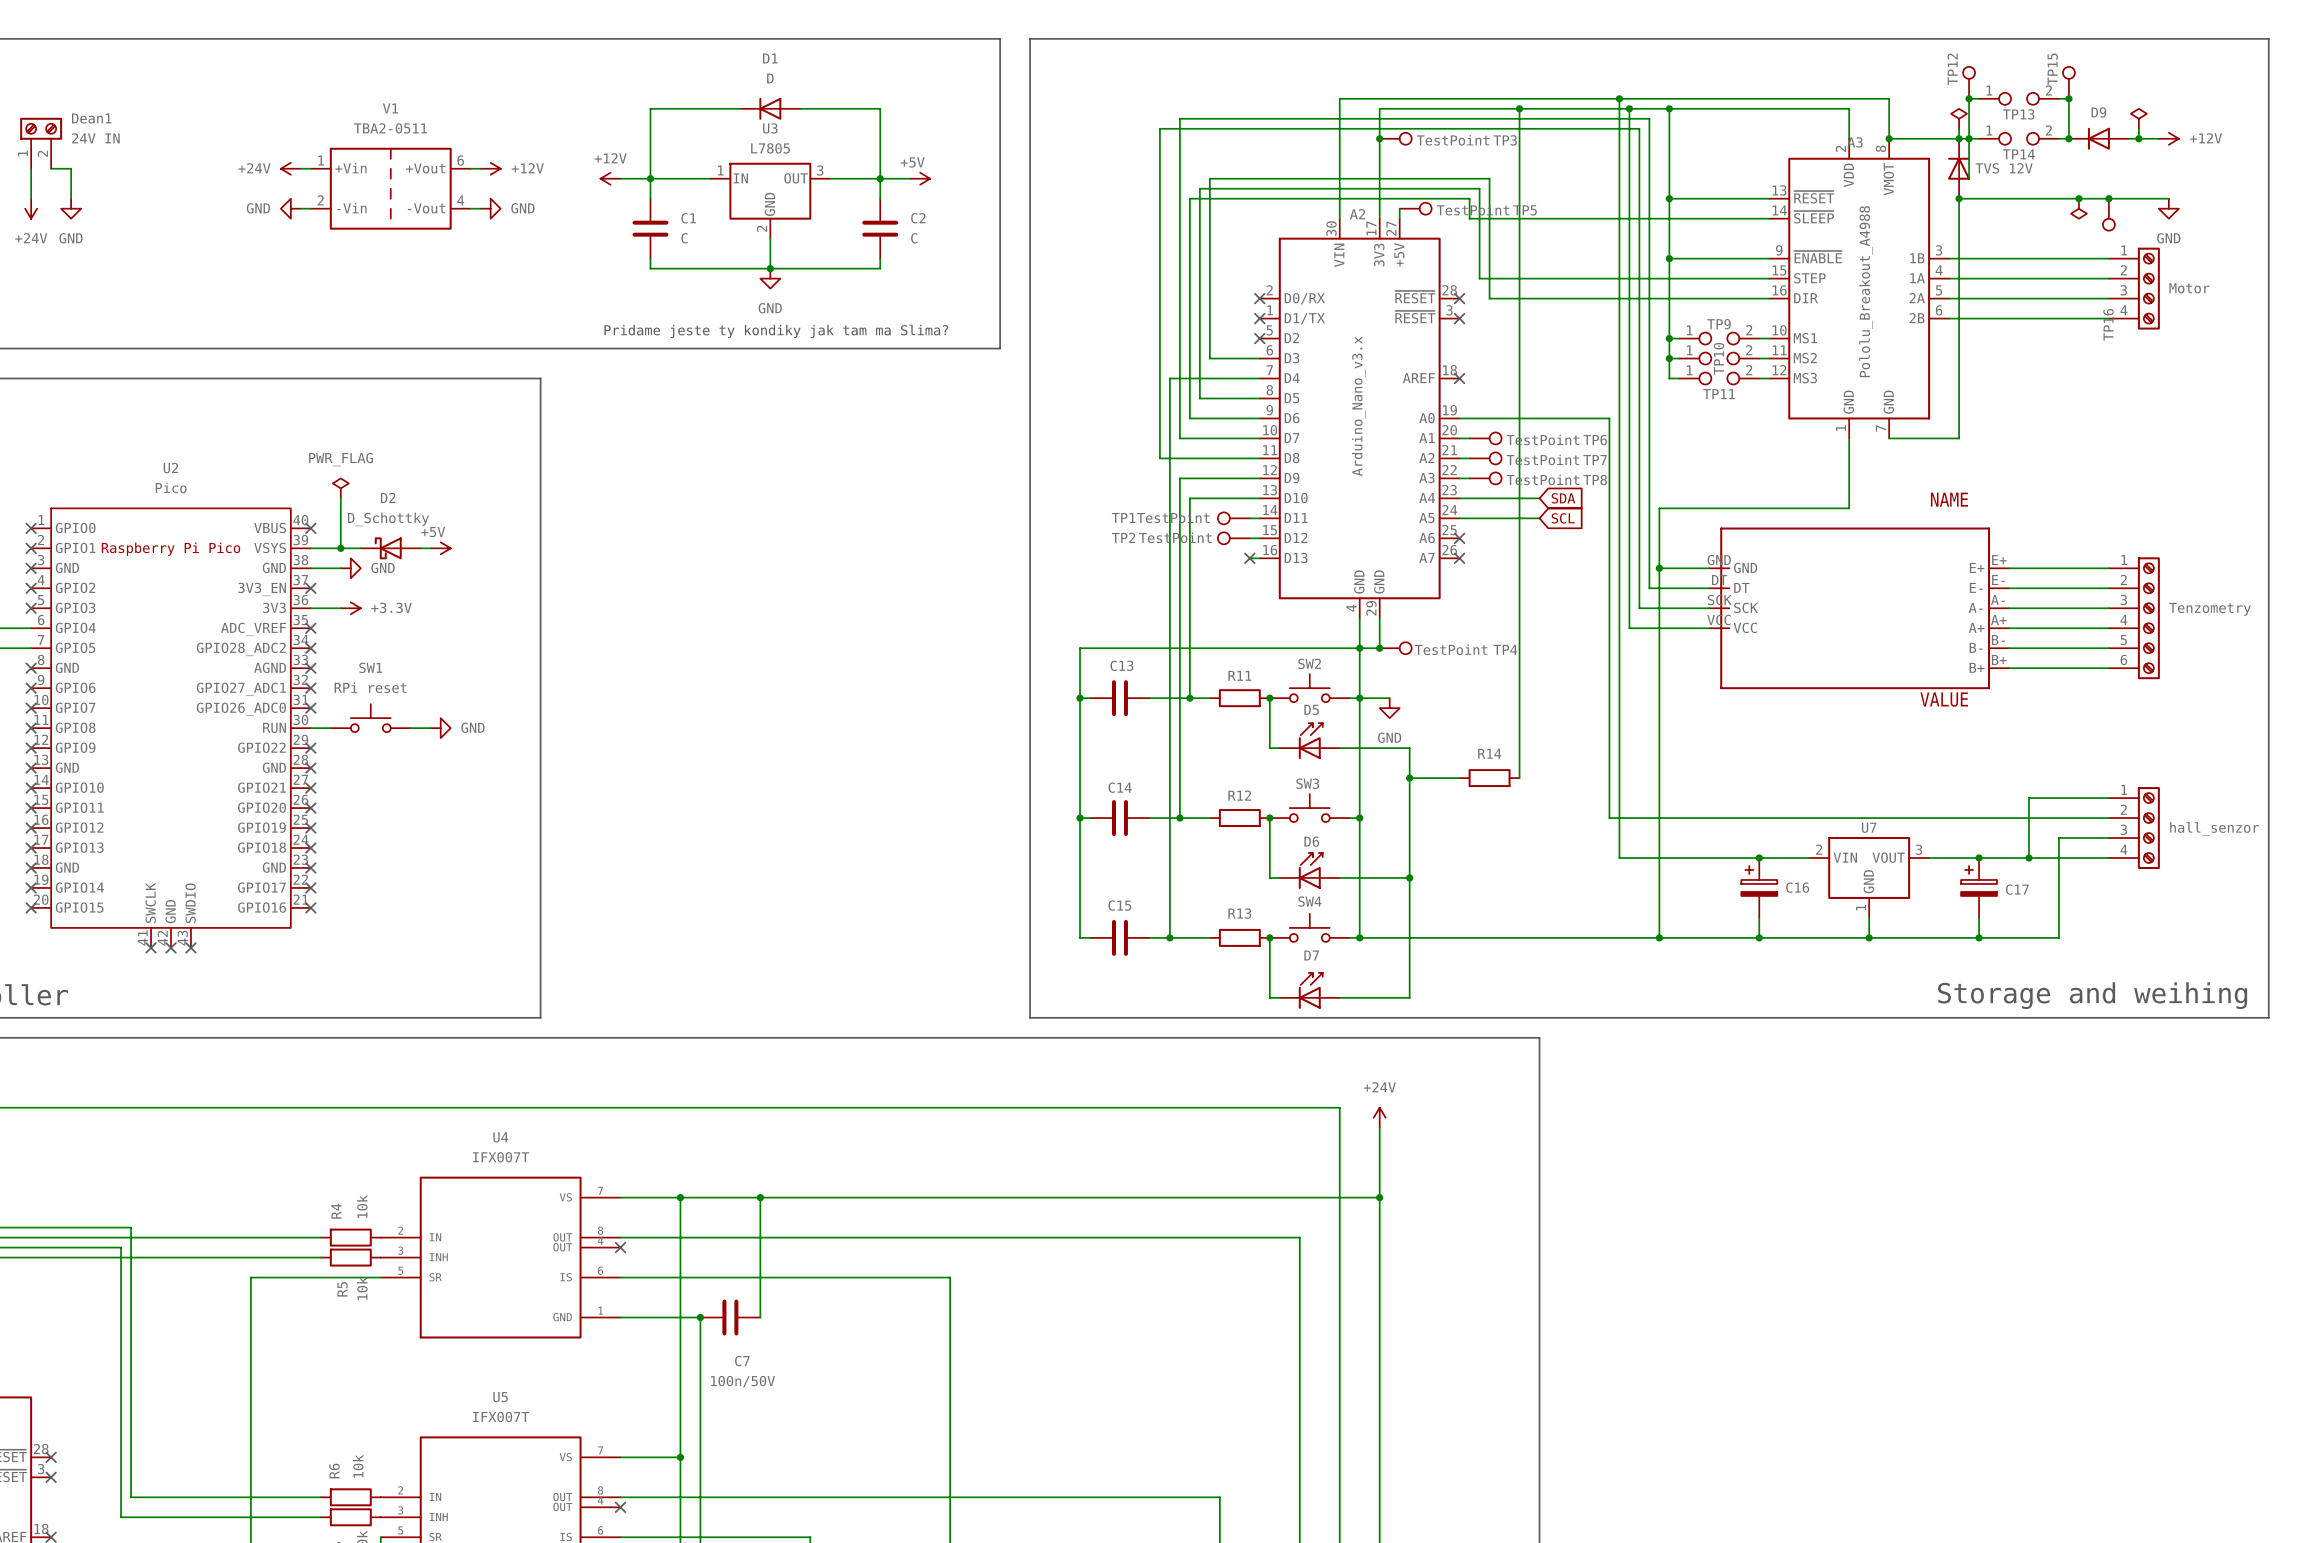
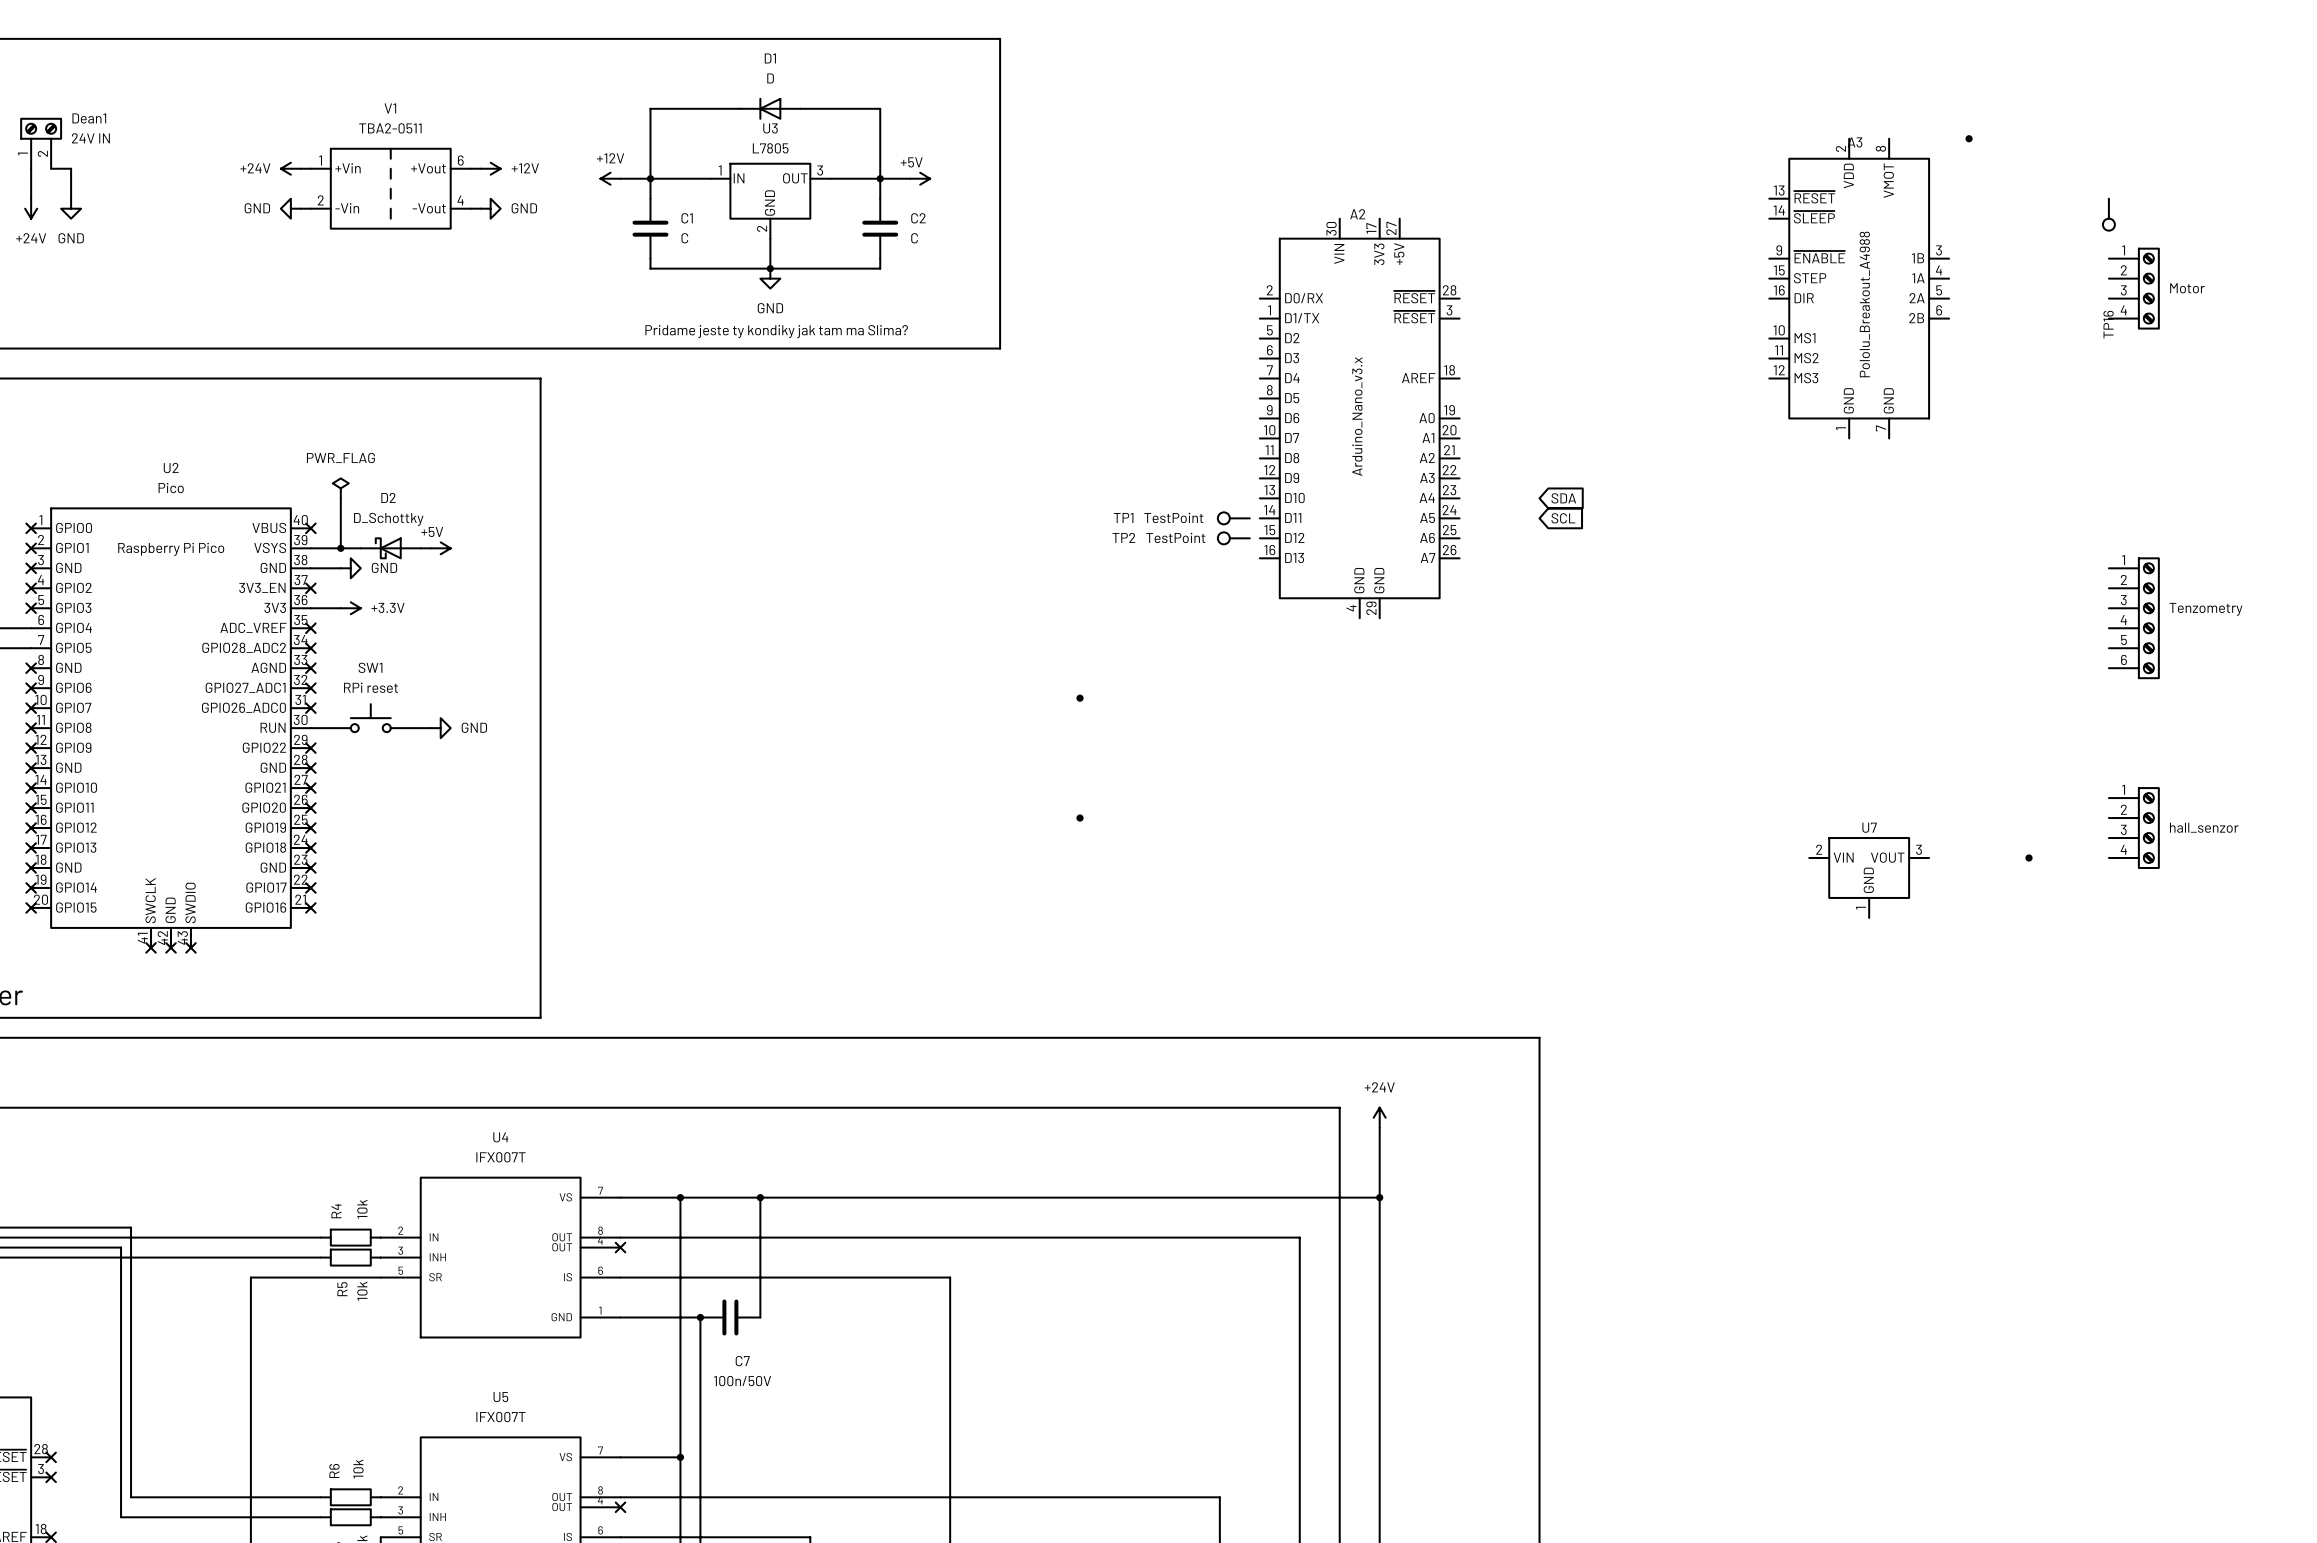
line: (1030, 38) (2268, 38) (2268, 1017) (1030, 1017) (1030, 38) -> none
TP12: (1969, 82) -> none
TP15: (2068, 82) -> none
wire: (1619, 98) (1619, 857) (1809, 857) -> none
junction: (1619, 98) -> none
junction: (1969, 98) -> none
wire: (1979, 98) (1969, 98) (1969, 178) -> none
TP13: (2019, 98) -> none
wire: (2058, 98) (2068, 98) (2068, 138) (2058, 138) -> none
junction: (2068, 98) -> none
wire: (1519, 108) (1519, 778) -> none
junction: (1519, 108) -> none
wire: (1629, 108) (1629, 628) (1709, 628) -> none
junction: (1629, 108) -> none
wire: (1669, 108) (1669, 378) (1679, 378) -> none
junction: (1669, 108) -> none
power symbol: (1959, 118) -> none
power symbol: (2138, 118) -> none
wire: (1959, 128) (1959, 138) -> none
wire: (2138, 128) (2138, 138) -> none
junction: (1379, 138) -> none
TP3: TestPoint (1395, 138) -> none
wire: (1849, 138) (1849, 108) (1379, 108) (1379, 218) -> none
junction: (1889, 138) -> none
junction: (1959, 138) -> none
wire: (1979, 138) (1889, 138) (1889, 98) (1339, 98) (1339, 218) -> none
TP14: (2019, 138) -> none
junction: (2068, 138) -> none
D9: (2098, 138) -> none
wire: (2128, 138) (2158, 138) -> none
junction: (2138, 138) -> none
power symbol: +12V (2168, 138) -> none
part: TVS 12V (1959, 168) -> none
wire: (1669, 198) (1769, 198) -> none
junction: (1669, 198) -> none
junction: (1959, 198) -> none
junction: (2078, 198) -> none
junction: (2108, 198) -> none
wire: (2168, 198) (1959, 198) (1959, 438) (1889, 438) -> none
wire: (1399, 208) (1399, 218) -> none
TP5: TestPoint (1415, 208) -> none
power symbol: (2078, 208) -> none
power symbol: GND (2168, 208) -> none
wire: (1769, 218) (1469, 218) (1469, 198) (1189, 198) (1189, 418) (1259, 418) -> none
wire: (1669, 258) (1769, 258) -> none
junction: (1669, 258) -> none
wire: (1949, 258) (2108, 258) -> none
wire: (1769, 278) (1479, 278) (1479, 188) (1199, 188) (1199, 398) (1259, 398) -> none
wire: (1949, 278) (2108, 278) -> none
no-connect mark: (1259, 298) -> none
no-connect mark: (1459, 298) -> none
wire: (1769, 298) (1489, 298) (1489, 178) (1209, 178) (1209, 358) (1259, 358) -> none
wire: (1949, 298) (2108, 298) -> none
no-connect mark: (1259, 318) -> none
no-connect mark: (1459, 318) -> none
wire: (1949, 318) (2108, 318) -> none
no-connect mark: (1259, 338) -> none
wire: (1669, 338) (1679, 338) -> none
junction: (1669, 338) -> none
TP9: (1719, 338) -> none
wire: (1759, 338) (1769, 338) -> none
wire: (1669, 358) (1679, 358) -> none
junction: (1669, 358) -> none
TP10: (1719, 358) -> none
wire: (1759, 358) (1769, 358) -> none
wire: (1259, 378) (1169, 378) (1169, 937) -> none
no-connect mark: (1459, 378) -> none
TP11: (1719, 378) -> none
wire: (1759, 378) (1769, 378) -> none
wire: (1459, 418) (1609, 418) (1609, 818) (2108, 818) -> none
wire: (1259, 438) (1179, 438) (1179, 118) (1649, 118) (1649, 588) (1709, 588) -> none
wire: (1459, 438) (1469, 438) -> none
TP6: TestPoint (1485, 438) -> none
wire: (1849, 438) (1849, 508) (1659, 508) (1659, 937) -> none
wire: (1259, 458) (1159, 458) (1159, 128) (1639, 128) (1639, 608) (1709, 608) -> none
wire: (1459, 458) (1469, 458) -> none
TP7: TestPoint (1485, 458) -> none
wire: (1259, 478) (1179, 478) (1179, 818) -> none
wire: (1459, 478) (1469, 478) -> none
TP8: TestPoint (1485, 478) -> none
wire: (1259, 498) (1189, 498) (1189, 698) -> none
wire: (1459, 498) (1539, 498) -> none
wire: (1249, 518) (1259, 518) -> none
wire: (1459, 518) (1539, 518) -> none
wire: (1249, 538) (1259, 538) -> none
no-connect mark: (1459, 538) -> none
wire: (1249, 558) (1259, 558) -> none
no-connect mark: (1249, 558) -> none
no-connect mark: (1459, 558) -> none
wire: (1659, 568) (1709, 568) -> none
junction: (1659, 568) -> none
wire: (2009, 568) (2108, 568) -> none
wire: (2009, 588) (2108, 588) -> none
part: (1859, 608) -> none
wire: (2009, 608) (2108, 608) -> none
wire: (1359, 618) (1359, 937) -> none
wire: (1379, 618) (1379, 648) (1080, 648) (1080, 937) (1090, 937) -> none
wire: (2009, 628) (2108, 628) -> none
junction: (1359, 648) -> none
junction: (1379, 648) -> none
TP4: TestPoint (1395, 648) -> none
wire: (2009, 648) (2108, 648) -> none
wire: (2009, 668) (2108, 668) -> none
SW2: (1309, 688) -> none
wire: (1080, 698) (1090, 698) -> none
C13: (1119, 698) -> none
wire: (1149, 698) (1209, 698) -> none
junction: (1189, 698) -> none
R11: (1239, 698) -> none
wire: (1269, 698) (1269, 748) (1279, 748) -> none
junction: (1269, 698) -> none
wire: (1349, 698) (1389, 698) -> none
junction: (1359, 698) -> none
power symbol: GND (1389, 708) -> none
D5: (1309, 741) -> none
wire: (1339, 748) (1409, 748) (1409, 997) (1339, 997) -> none
wire: (1409, 778) (1459, 778) -> none
junction: (1409, 778) -> none
R14: (1489, 778) -> none
wire: (2108, 798) (2029, 798) (2029, 857) -> none
SW3: (1309, 808) -> none
wire: (1080, 818) (1090, 818) -> none
C14: (1119, 818) -> none
wire: (1149, 818) (1209, 818) -> none
junction: (1179, 818) -> none
R12: (1239, 818) -> none
wire: (1269, 818) (1269, 877) (1279, 877) -> none
junction: (1269, 818) -> none
wire: (1349, 818) (1359, 818) -> none
junction: (1359, 818) -> none
wire: (2108, 838) (2058, 838) (2058, 937) (1349, 937) -> none
junction: (1759, 857) -> none
wire: (1929, 857) (2108, 857) -> none
junction: (1979, 857) -> none
D6: (1309, 870) -> none
wire: (1339, 877) (1409, 877) -> none
junction: (1409, 877) -> none
C16: (1759, 887) -> none
C17: (1979, 887) -> none
wire: (1759, 917) (1759, 937) -> none
wire: (1869, 917) (1869, 937) -> none
wire: (1979, 917) (1979, 937) -> none
SW4: (1309, 927) -> none
C15: (1119, 937) -> none
wire: (1149, 937) (1209, 937) -> none
junction: (1169, 937) -> none
R13: (1239, 937) -> none
wire: (1269, 937) (1269, 997) (1279, 997) -> none
junction: (1269, 937) -> none
junction: (1359, 937) -> none
junction: (1659, 937) -> none
junction: (1759, 937) -> none
junction: (1869, 937) -> none
junction: (1979, 937) -> none
D7: (1309, 990) -> none
text: Storage and weihing (2092, 995) -> none

